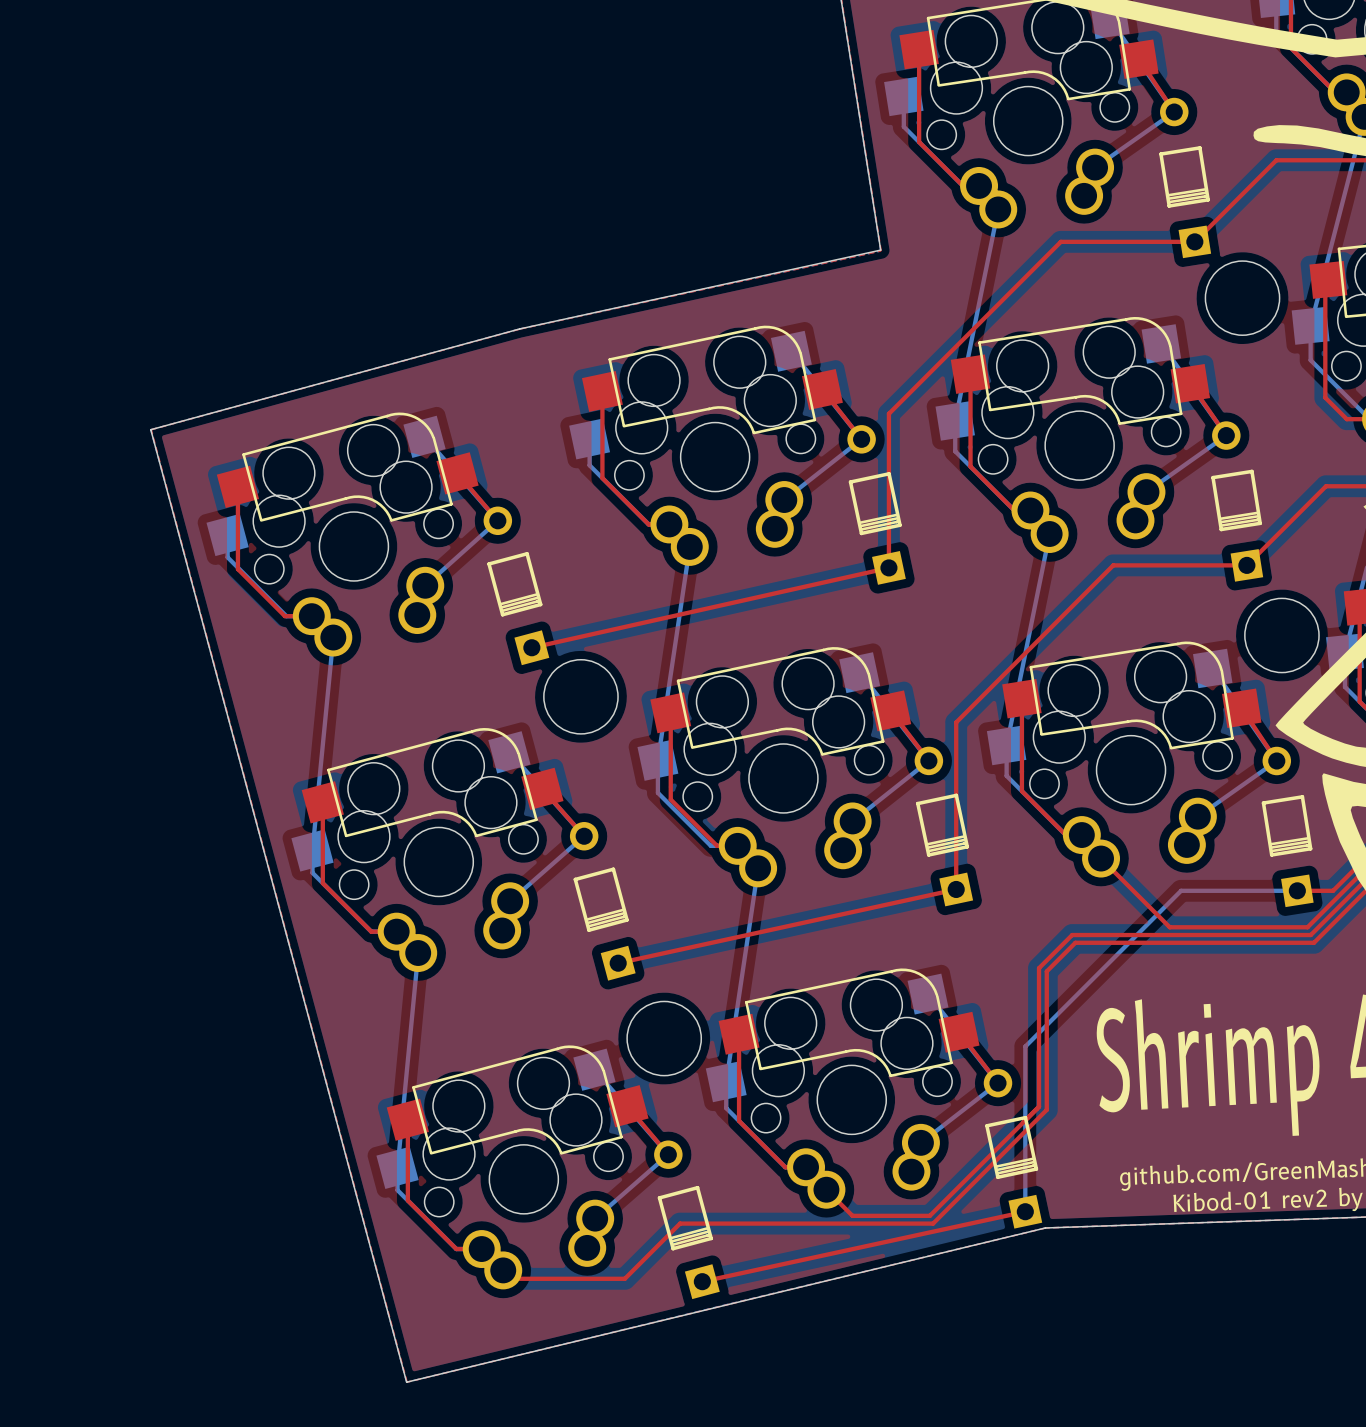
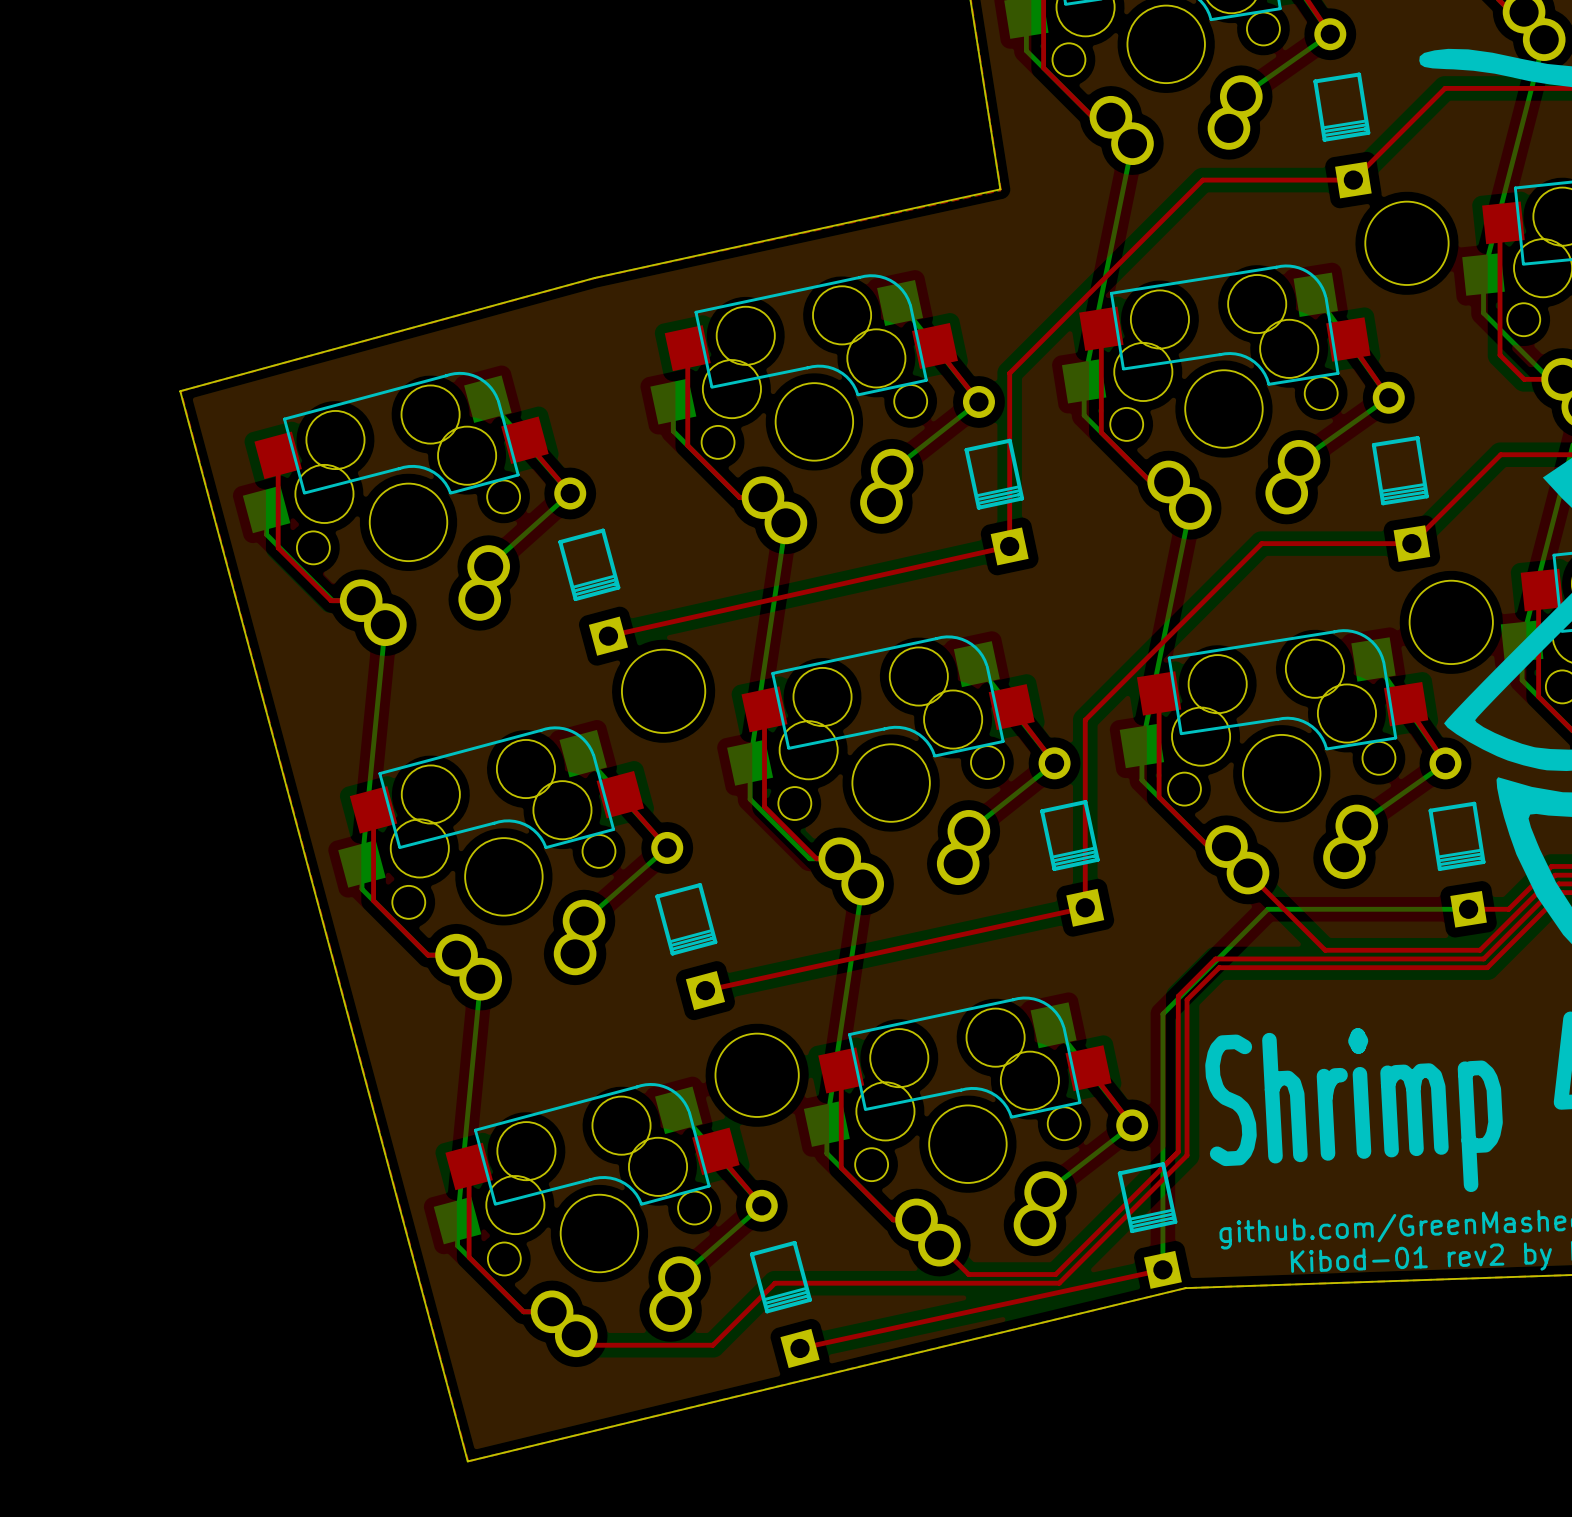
bottom track: (1181, 890) (1025, 1046) -> (1337, 909) (1267, 909) (1162, 1014) (1162, 1084)

